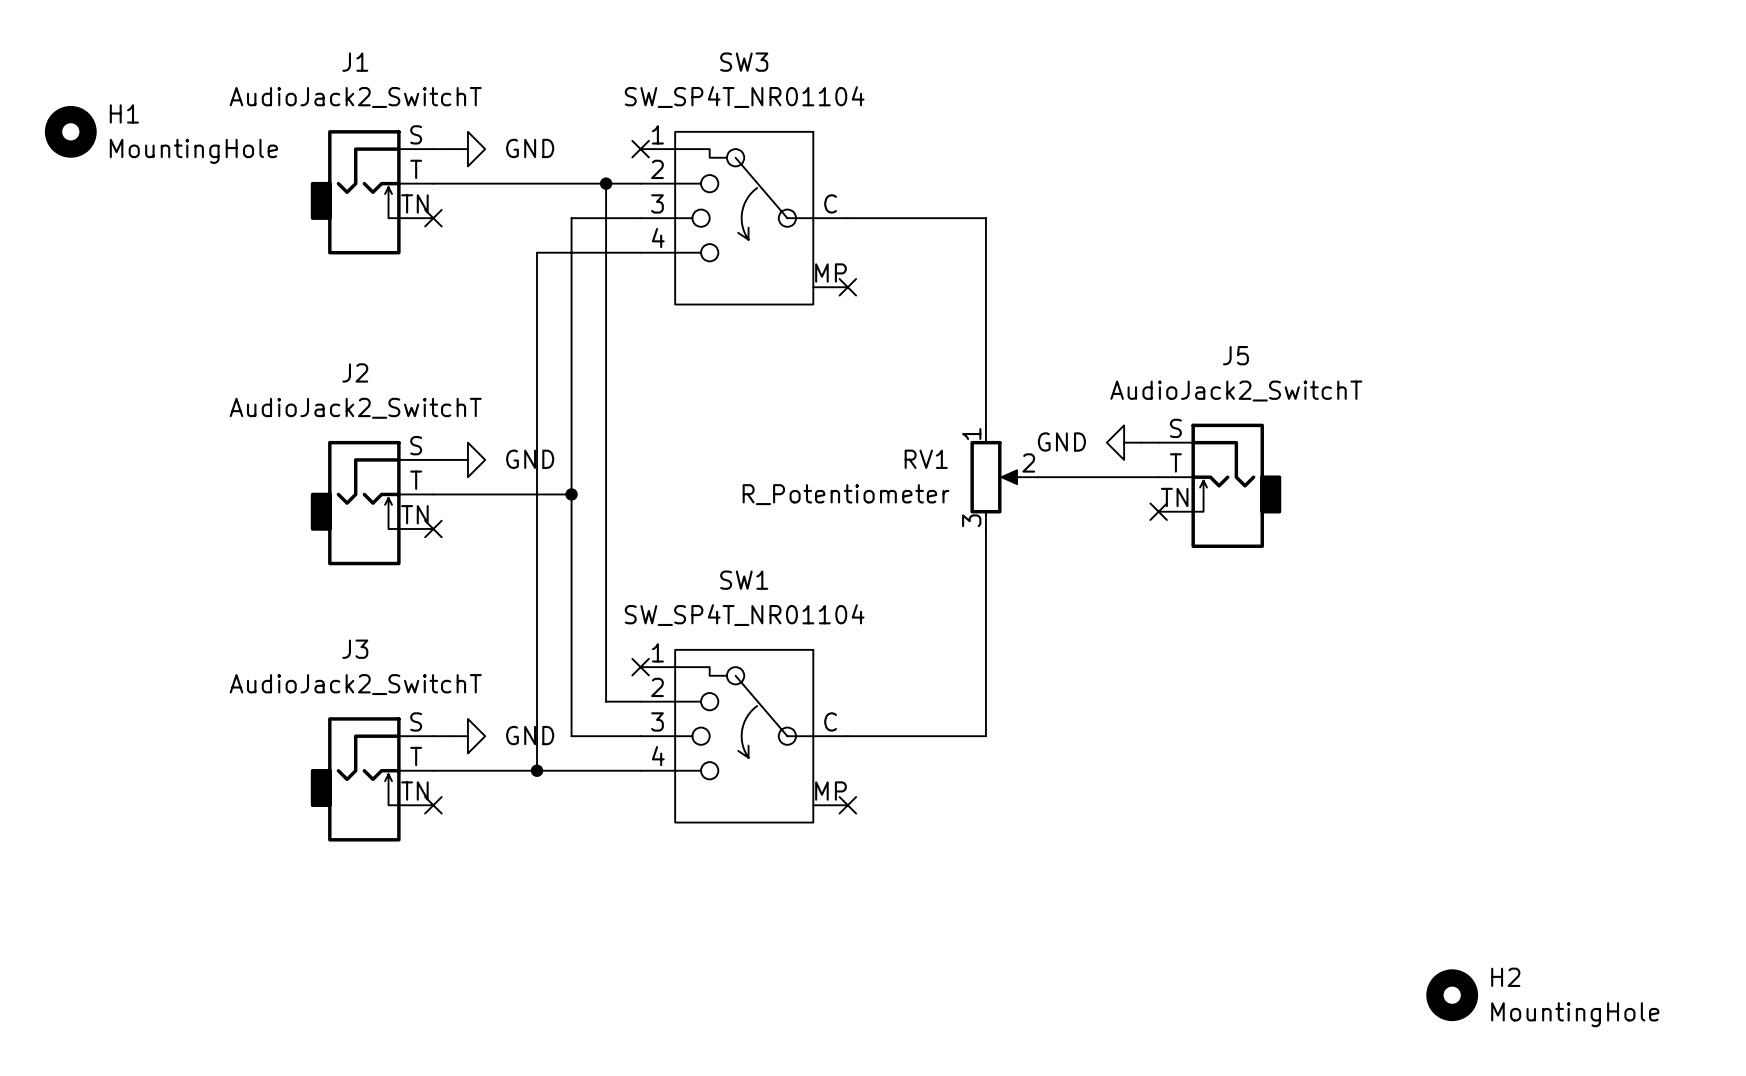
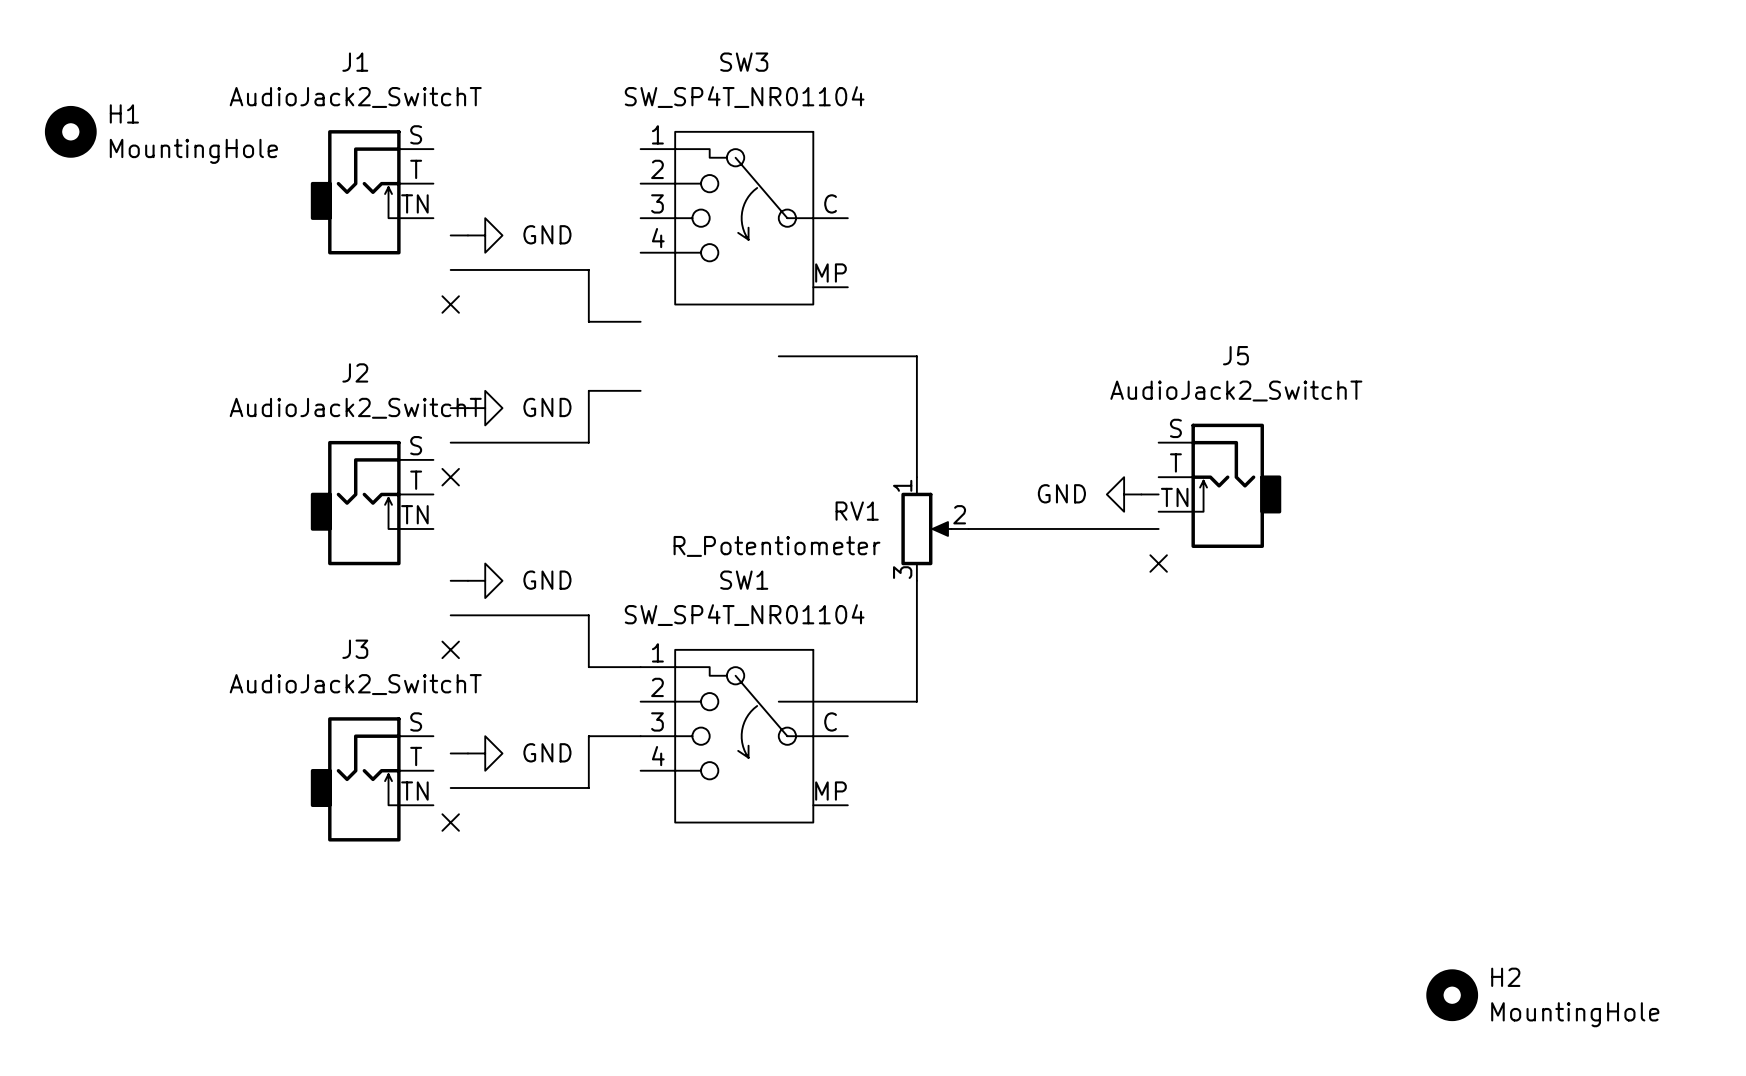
wire: (433, 149) (450, 149) -> (450, 235) (467, 235)
power symbol position: GND (467, 149) -> GND (485, 235)
no-connect mark: (640, 149) -> none
wire: (433, 183) (640, 183) -> none
wire: (606, 183) (606, 701) (640, 701) -> none
junction: (606, 183) -> none
no-connect mark: (433, 218) -> none
wire: (640, 218) (571, 218) (571, 736) (588, 736) -> (450, 788) (588, 788) (588, 736)
wire: (847, 218) (985, 218) (985, 425) -> none
wire: (640, 252) (537, 252) (537, 770) -> none
wire: none -> (450, 269) (588, 269) (588, 321) (640, 321)
no-connect mark: (847, 287) -> none
no-connect mark: none -> (450, 304)
wire: none -> (778, 356) (916, 356) (916, 477)
wire: none -> (640, 390) (588, 390) (588, 442) (450, 442)
power symbol position: GND (1124, 442) -> GND (1124, 494)
wire: (1141, 442) (1158, 442) -> (1141, 494) (1158, 494)
wire: (433, 459) (450, 459) -> (450, 408) (467, 408)
power symbol position: GND (467, 459) -> GND (485, 408)
RV1 position: (1004, 477) -> (935, 528)
wire: (1037, 477) (1158, 477) -> none
wire: (433, 494) (571, 494) -> none
junction: (571, 494) -> none
no-connect mark position: (1158, 511) -> (1158, 563)
no-connect mark position: (433, 528) -> (450, 477)
wire: none -> (968, 528) (1158, 528)
wire: (985, 528) (985, 736) (847, 736) -> none
wire: none -> (450, 580) (467, 580)
power symbol: none -> GND (485, 580)
wire: none -> (916, 580) (916, 701) (778, 701)
wire: none -> (450, 615) (588, 615) (588, 667) (640, 667)
no-connect mark: none -> (450, 649)
no-connect mark: (640, 667) -> none
wire: (433, 736) (450, 736) -> (450, 753) (467, 753)
power symbol position: GND (467, 736) -> GND (485, 753)
wire: (433, 770) (640, 770) -> none
junction: (537, 770) -> none
no-connect mark position: (433, 805) -> (450, 822)
no-connect mark: (847, 805) -> none

